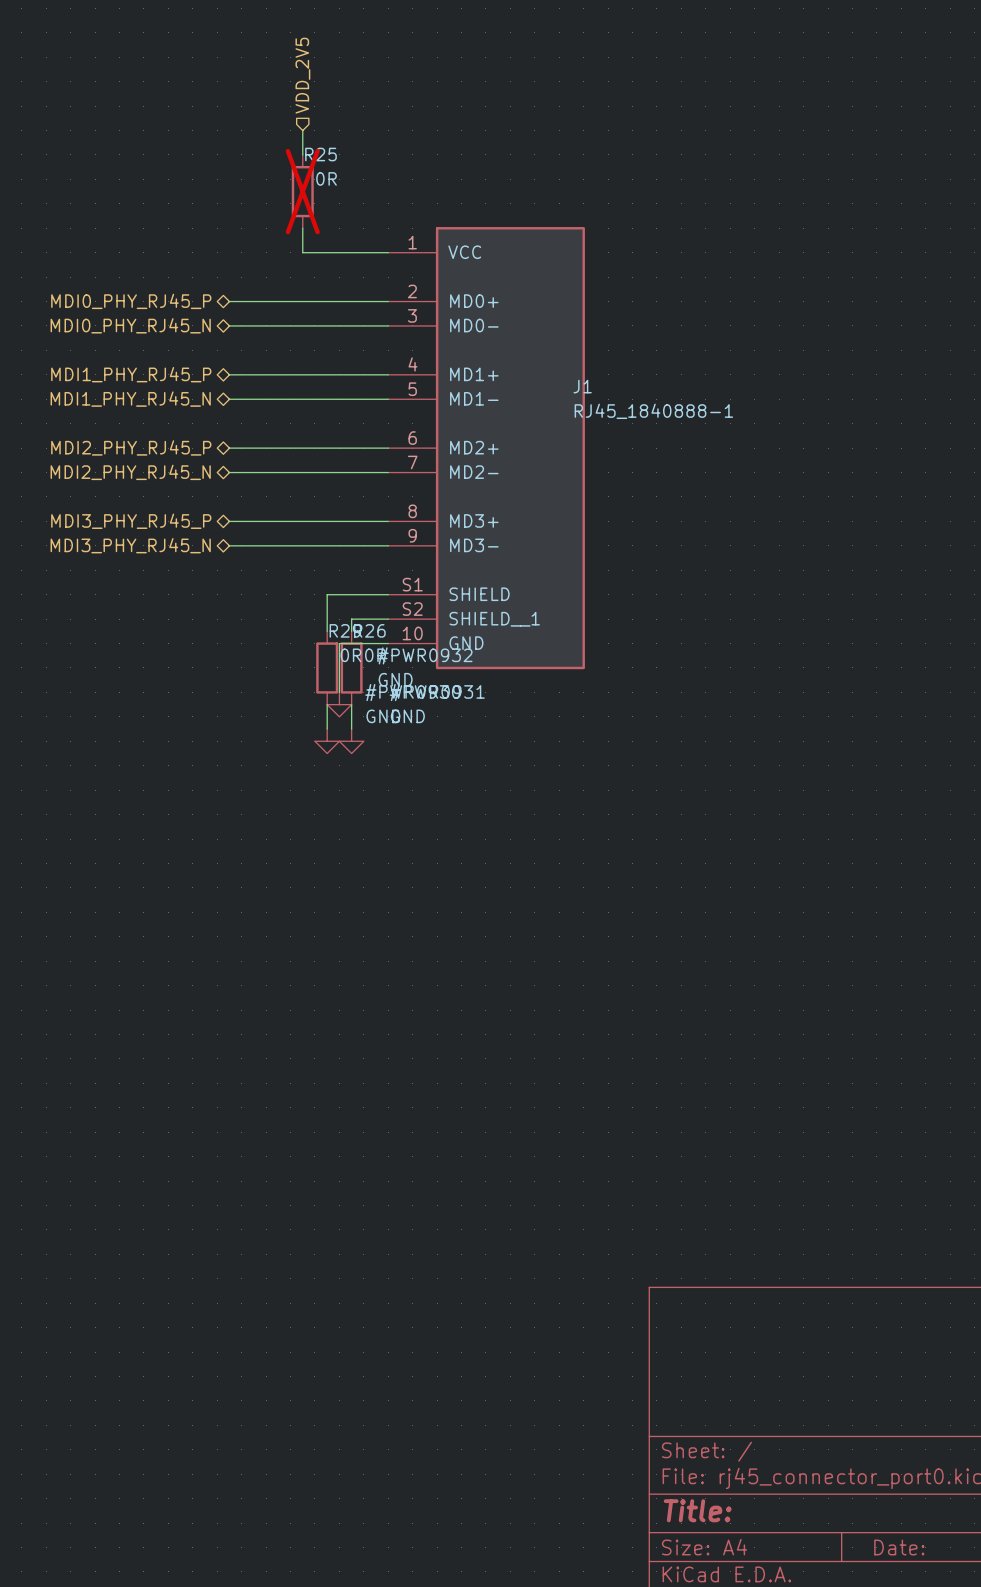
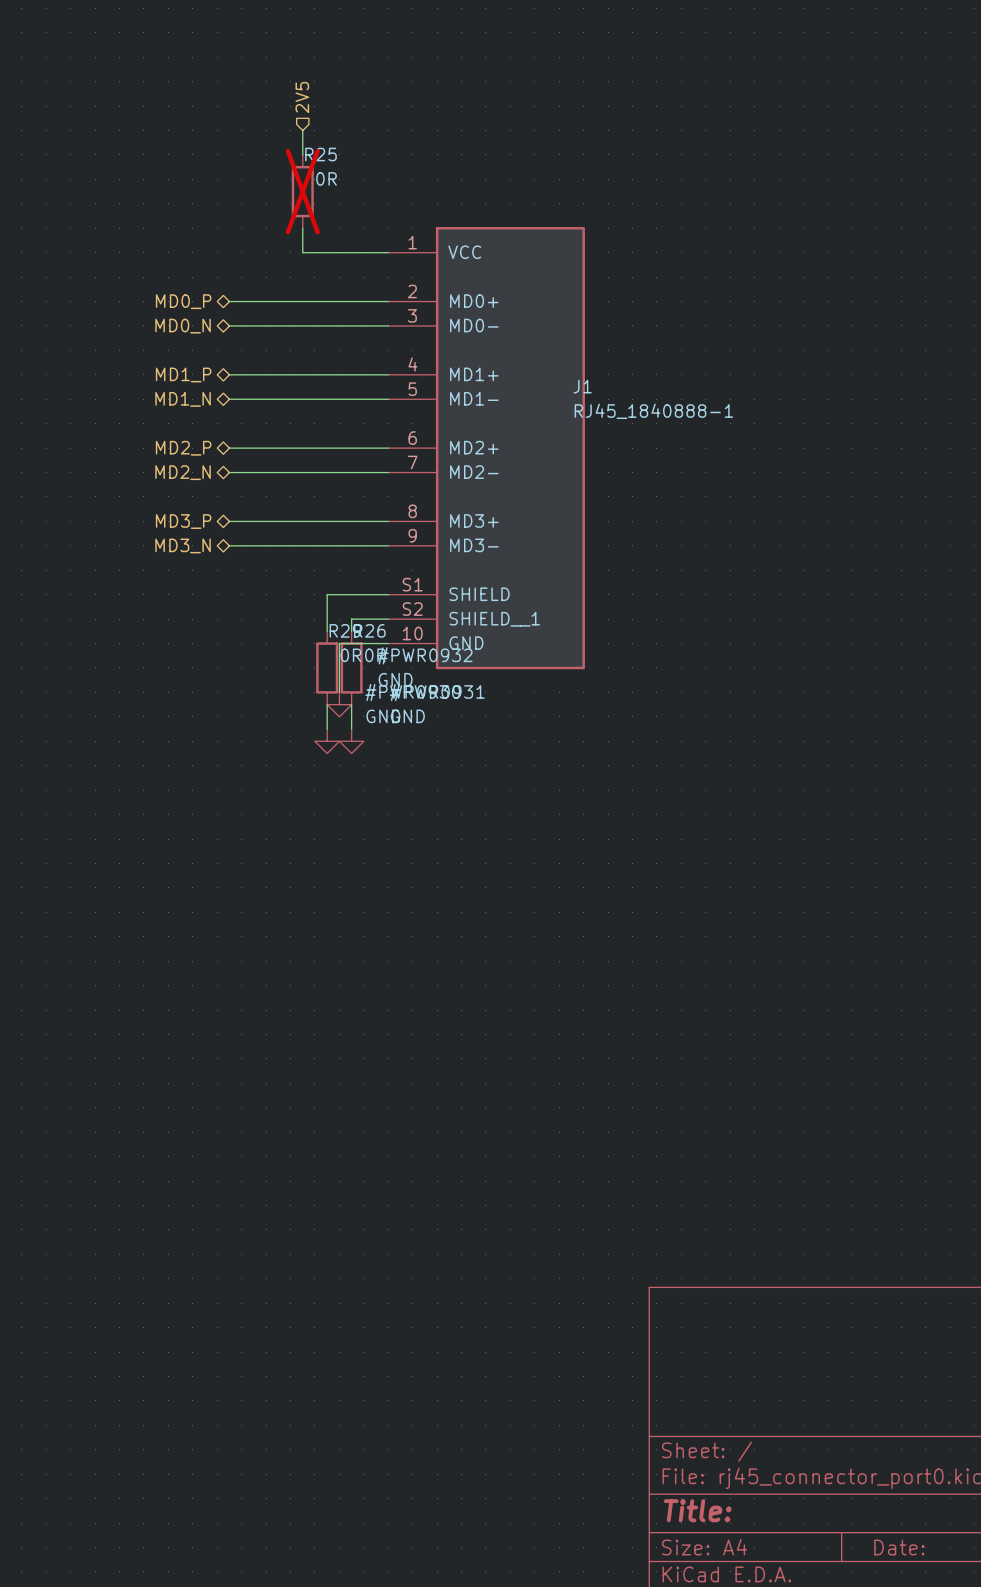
hierarchical label: VDD_2V5 (302, 75) -> 2V5 (302, 97)
hierarchical label: MDI0_PHY_RJ45_P (131, 301) -> MD0_P (183, 301)
hierarchical label: MDI0_PHY_RJ45_N (130, 325) -> MD0_N (183, 326)
hierarchical label: MDI1_PHY_RJ45_P (131, 374) -> MD1_P (183, 374)
hierarchical label: MDI1_PHY_RJ45_N (130, 399) -> MD1_N (183, 399)
hierarchical label: MDI2_PHY_RJ45_P (131, 447) -> MD2_P (183, 448)
hierarchical label: MDI2_PHY_RJ45_N (130, 472) -> MD2_N (183, 472)
hierarchical label: MDI3_PHY_RJ45_P (131, 521) -> MD3_P (183, 521)
hierarchical label: MDI3_PHY_RJ45_N (130, 545) -> MD3_N (183, 545)

